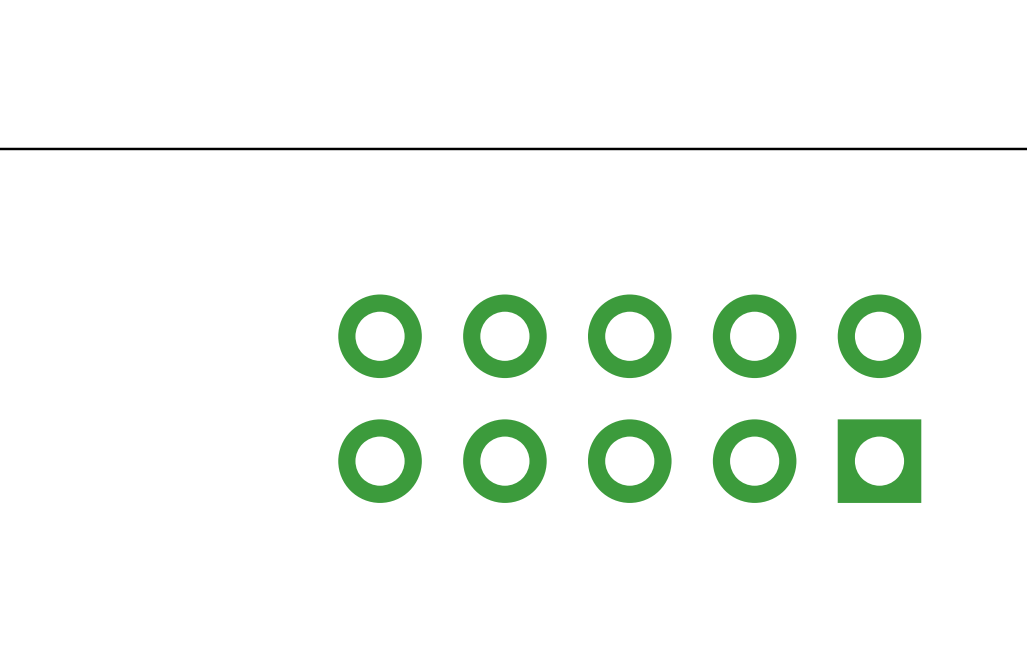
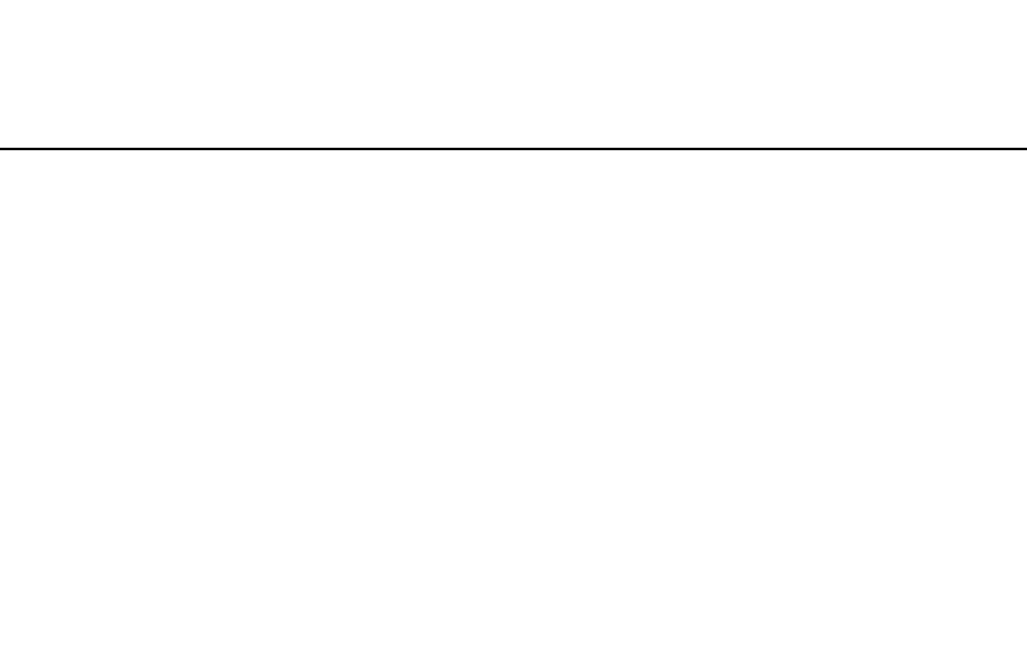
part: (629, 398) -> none

